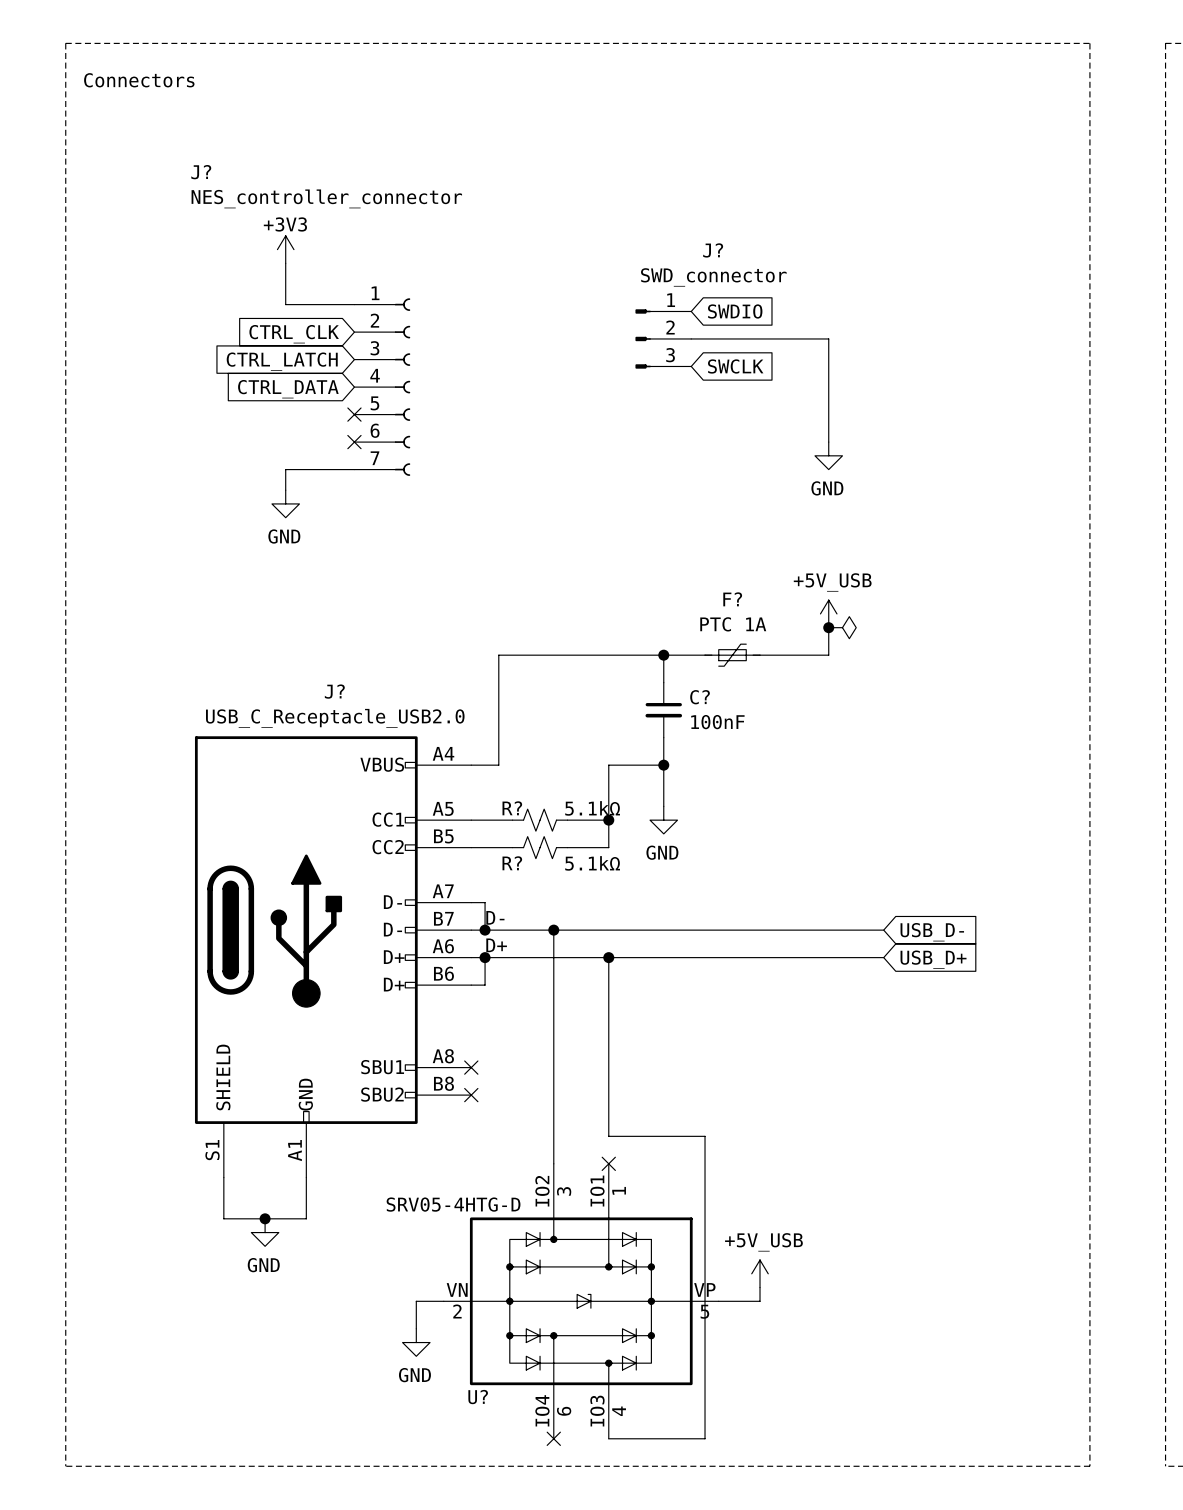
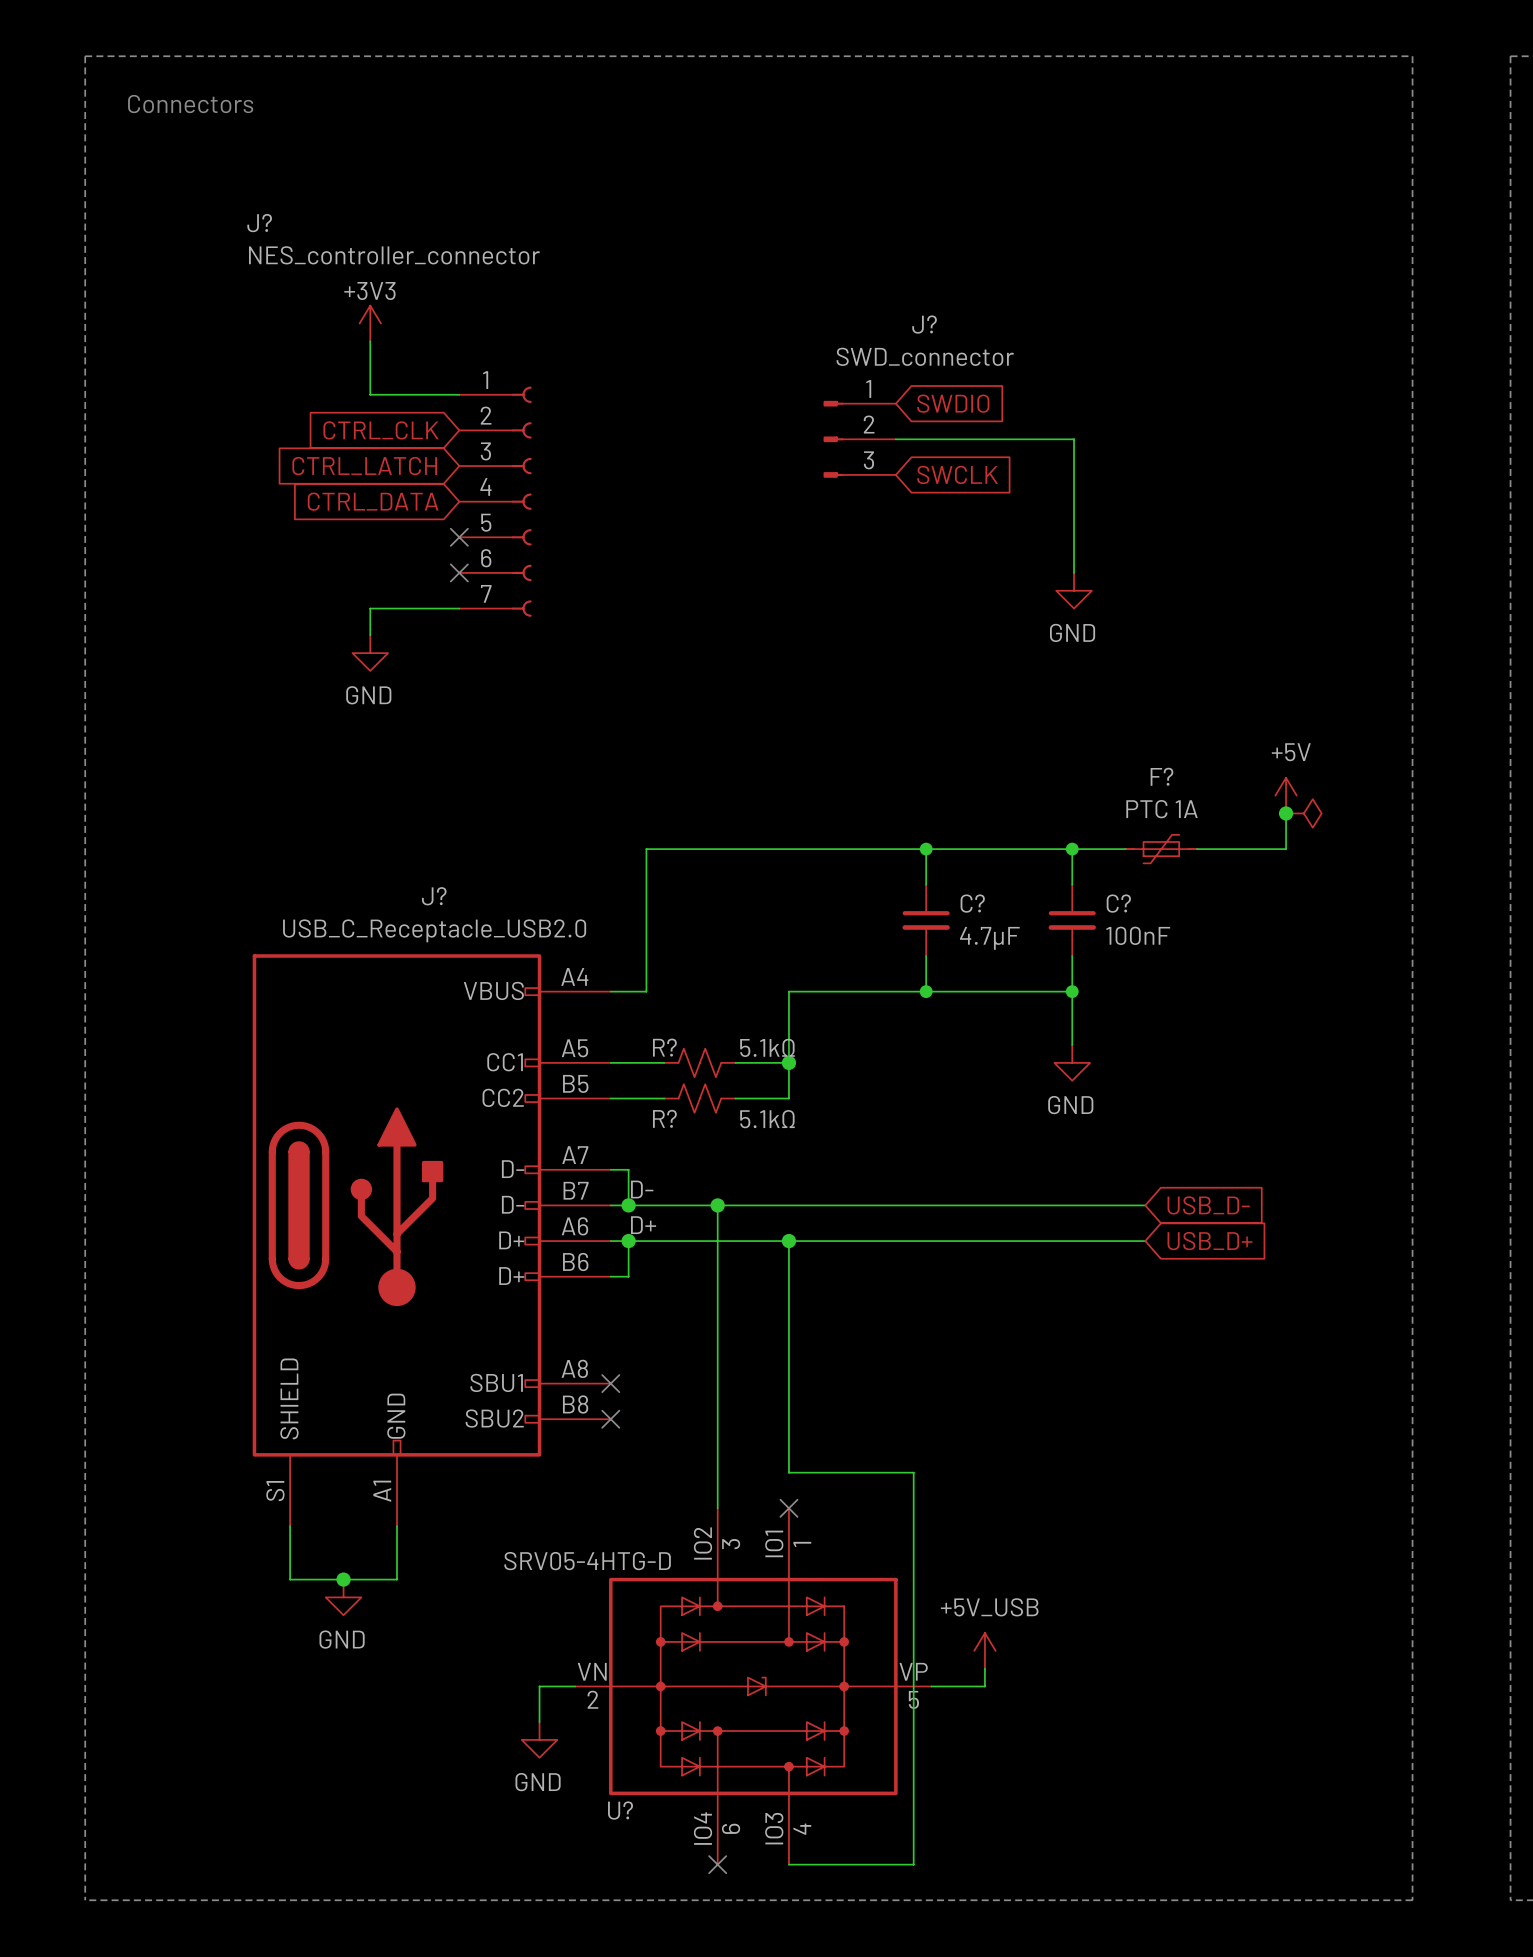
power symbol: +5V_USB (828, 613) -> none
power symbol: none -> +5V (1286, 795)
wire: (828, 627) (828, 655) -> (1125, 849) (1074, 849)
junction: (828, 627) -> none
power symbol position: (842, 627) -> (1303, 813)
wire: none -> (1286, 813) (1286, 849) (1196, 849)
junction: none -> (1286, 813)
wire: (663, 655) (663, 682) -> (1072, 849) (1072, 884)
junction: (663, 655) -> none
wire: none -> (926, 849) (926, 884)
junction: none -> (926, 849)
F? position: (732, 655) -> (1161, 849)
junction: none -> (1072, 849)
C? position: (663, 710) -> (1072, 920)
C?: none -> 4.7µF (926, 920)
wire: (663, 737) (663, 806) -> (1072, 955) (1072, 1045)
wire: none -> (926, 955) (926, 991)
wire: none -> (860, 991) (1072, 991)
junction: (663, 765) -> none
junction: none -> (926, 991)
junction: none -> (1072, 991)
power symbol position: GND (663, 820) -> GND (1072, 1062)

